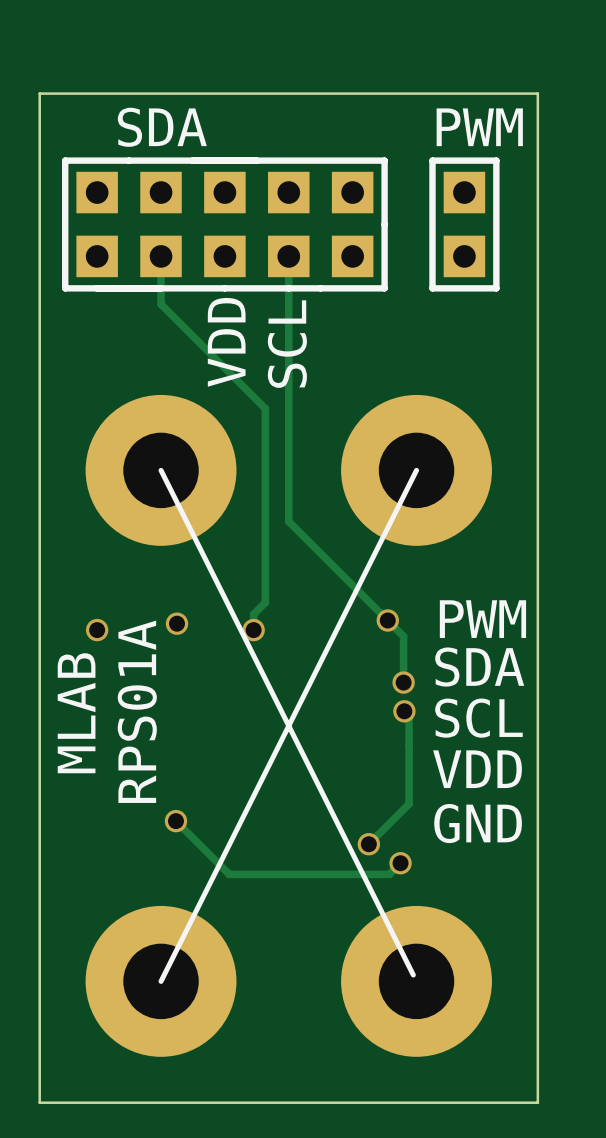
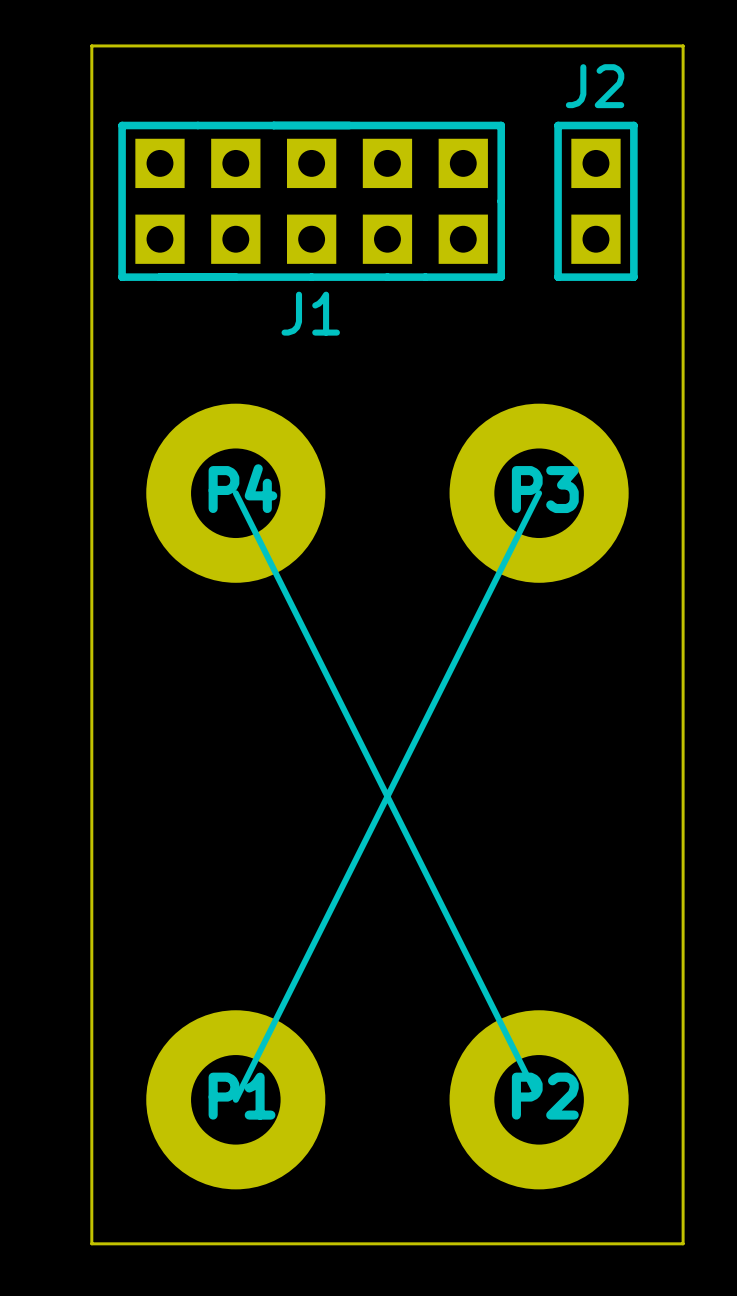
text: SDA (162, 127) -> none
J2 name: none -> J2 (595, 86)
text: PWM (479, 127) -> none
track: (161, 256) (161, 304) (265, 408) (265, 602) (253, 614) (253, 630) -> none
track: (288, 256) (288, 521) (403, 636) (403, 682) -> none
J1 name: none -> J1 (310, 313)
text: VDD (226, 342) -> none
text: SCL (287, 344) -> none
P4 name: none -> P4 (242, 488)
P3 name: none -> P3 (545, 489)
text: PWM (482, 619) -> none
via: (387, 620) -> none
via: (177, 623) -> none
via: (97, 630) -> none
via: (253, 630) -> none
text: SDA (479, 667) -> none
via: (403, 682) -> none
text: RPS01A (137, 711) -> none
track: (404, 711) (409, 716) (409, 804) (368, 844) -> none
via: (404, 711) -> none
text: MLAB (76, 713) -> none
text: SCL (478, 718) -> none
text: VDD (477, 769) -> none
track: (175, 821) (229, 874) (389, 874) (400, 863) -> none
via: (175, 821) -> none
text: GND (478, 823) -> none
via: (368, 844) -> none
via: (400, 863) -> none
P1 name: none -> P1 (242, 1096)
P2 name: none -> P2 (545, 1096)

